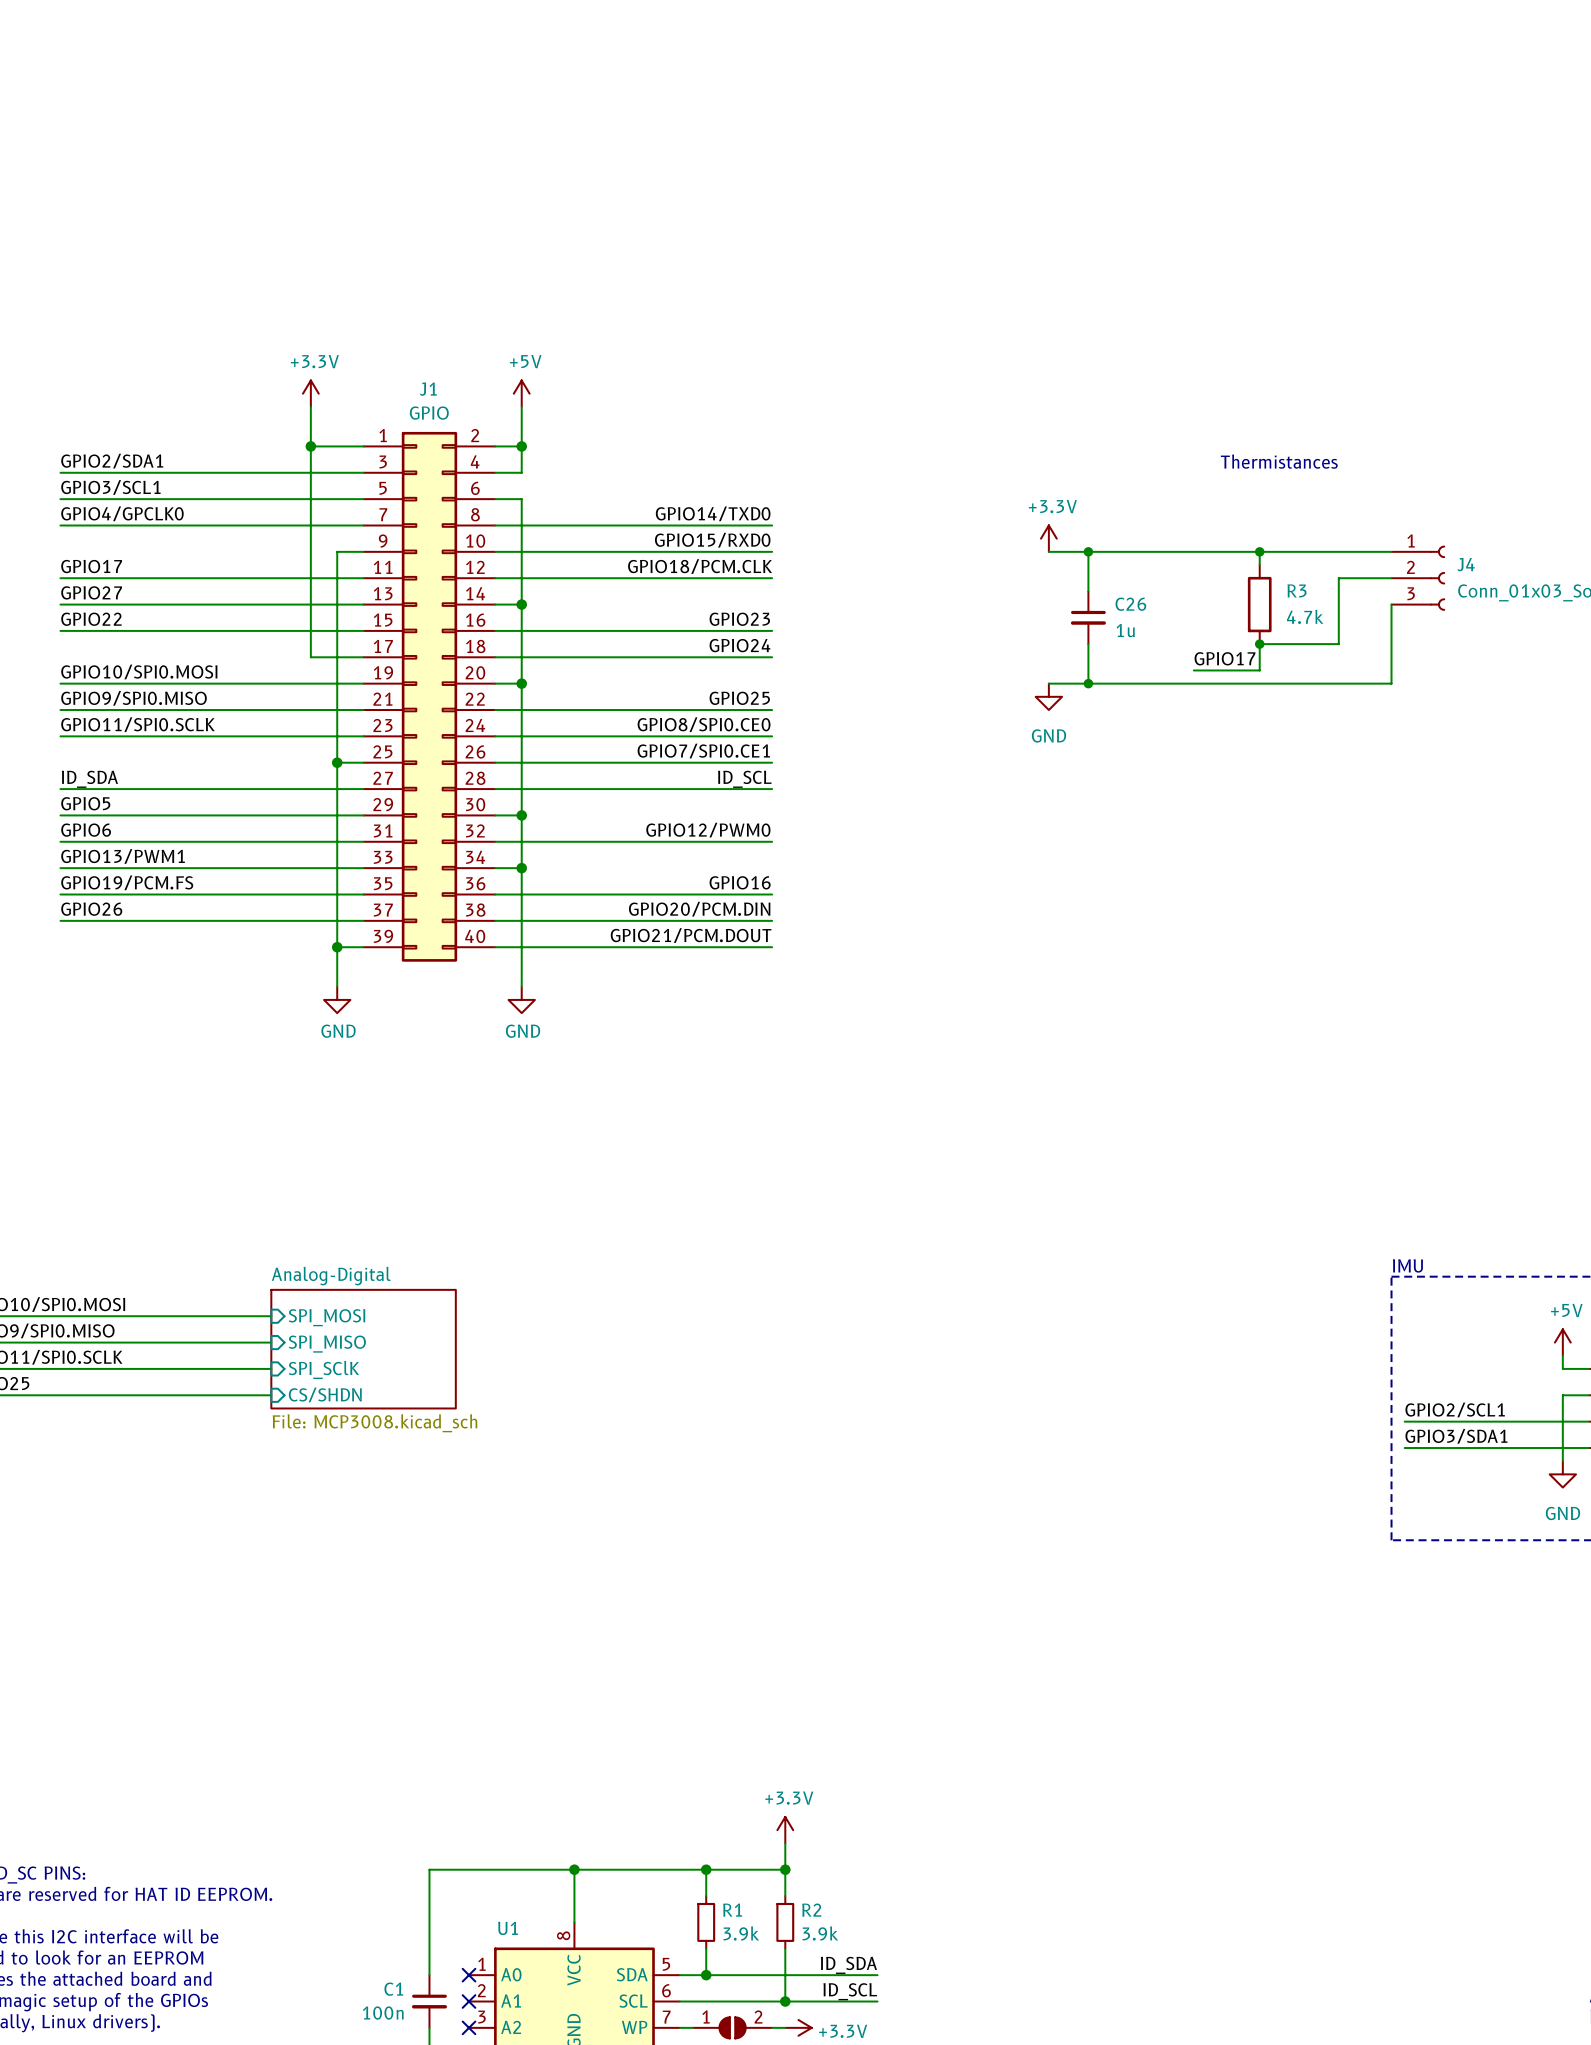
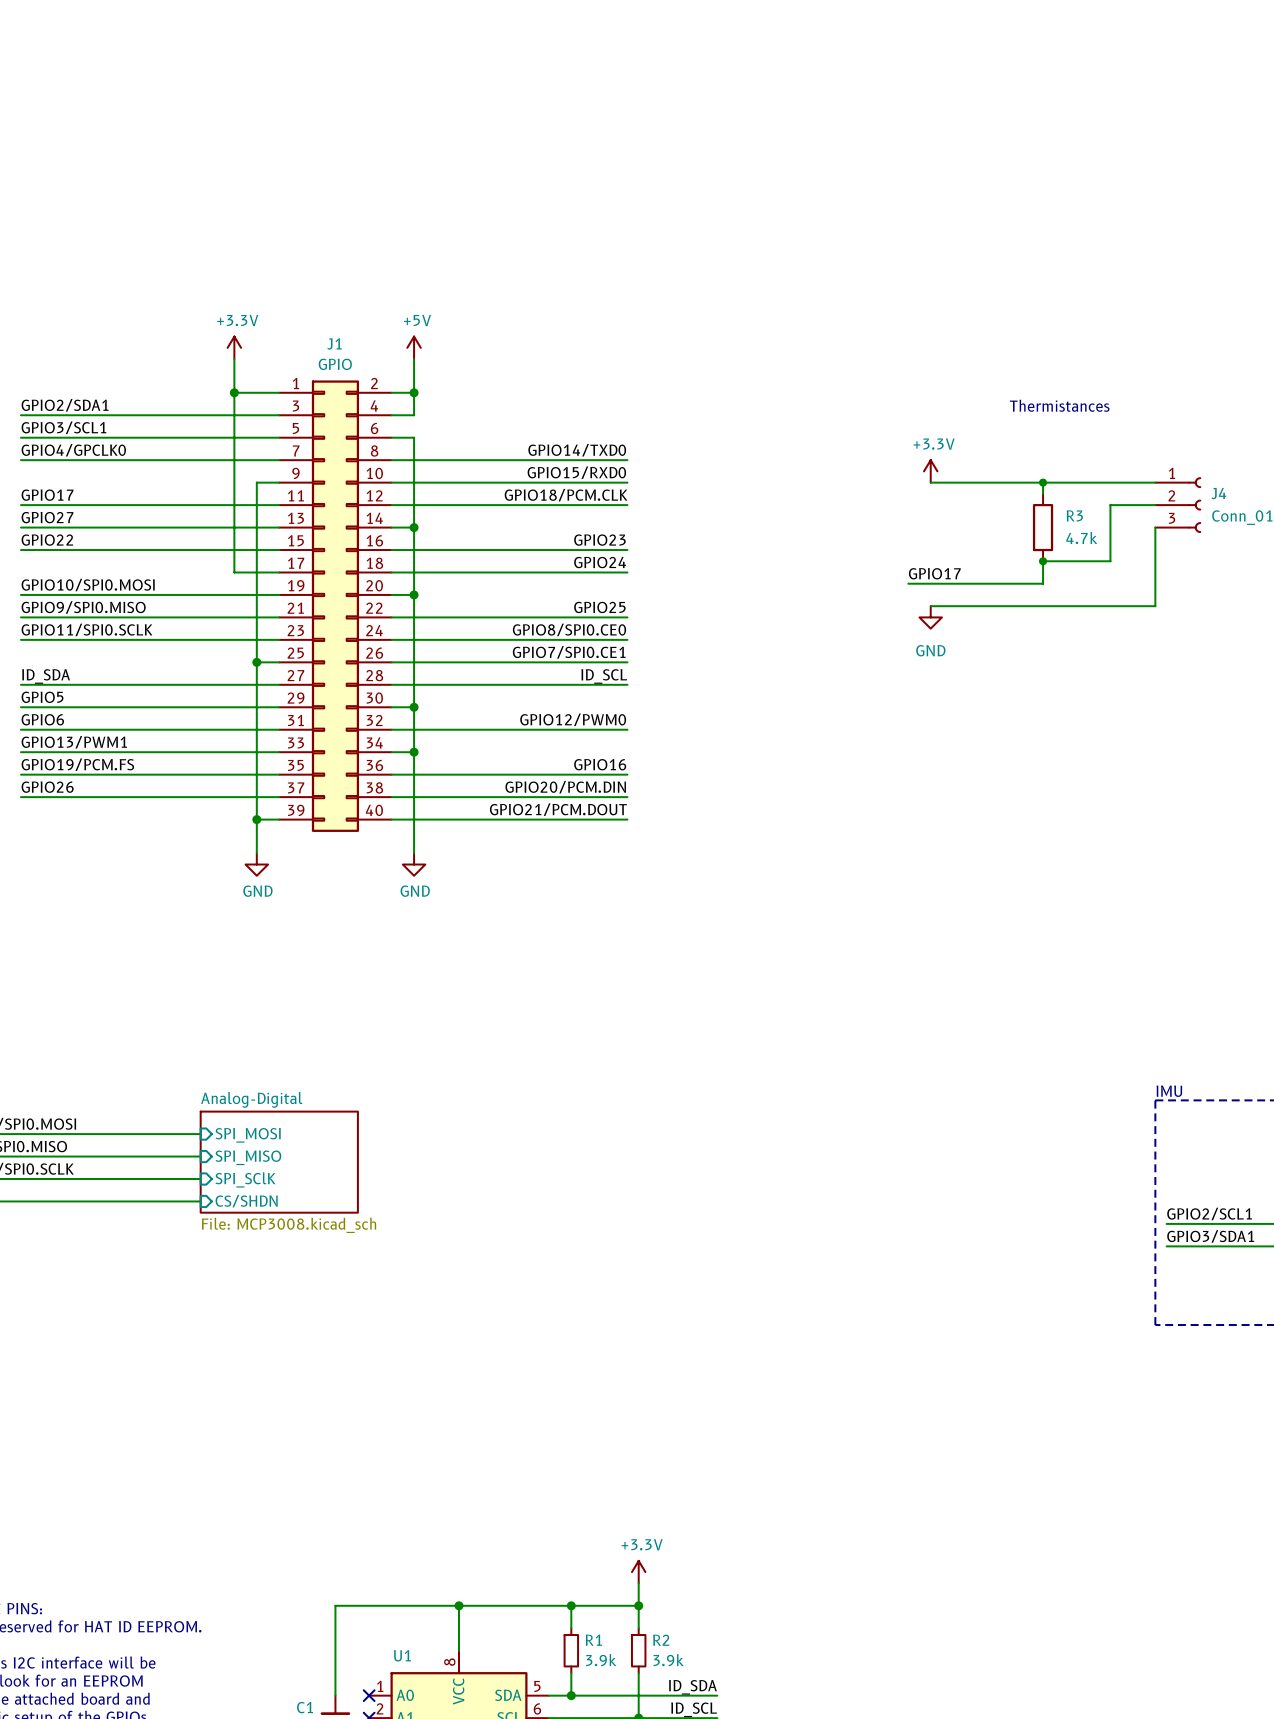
power symbol position: +3.3V (1048, 538) -> +3.3V (930, 471)
wire: (1048, 551) (1127, 551) -> none
wire: (1088, 551) (1088, 591) -> none
junction: (1088, 551) -> none
C26: 1u (1088, 617) -> none
wire: (1088, 644) (1088, 683) -> none
label position: GPIO17 (1225, 658) -> GPIO17 (934, 573)
wire: none -> (908, 583) (986, 583)
wire: (1048, 683) (1391, 683) -> (930, 606) (1155, 606) (1155, 594)
junction: (1088, 683) -> none
power symbol position: GND (1048, 696) -> GND (930, 617)

